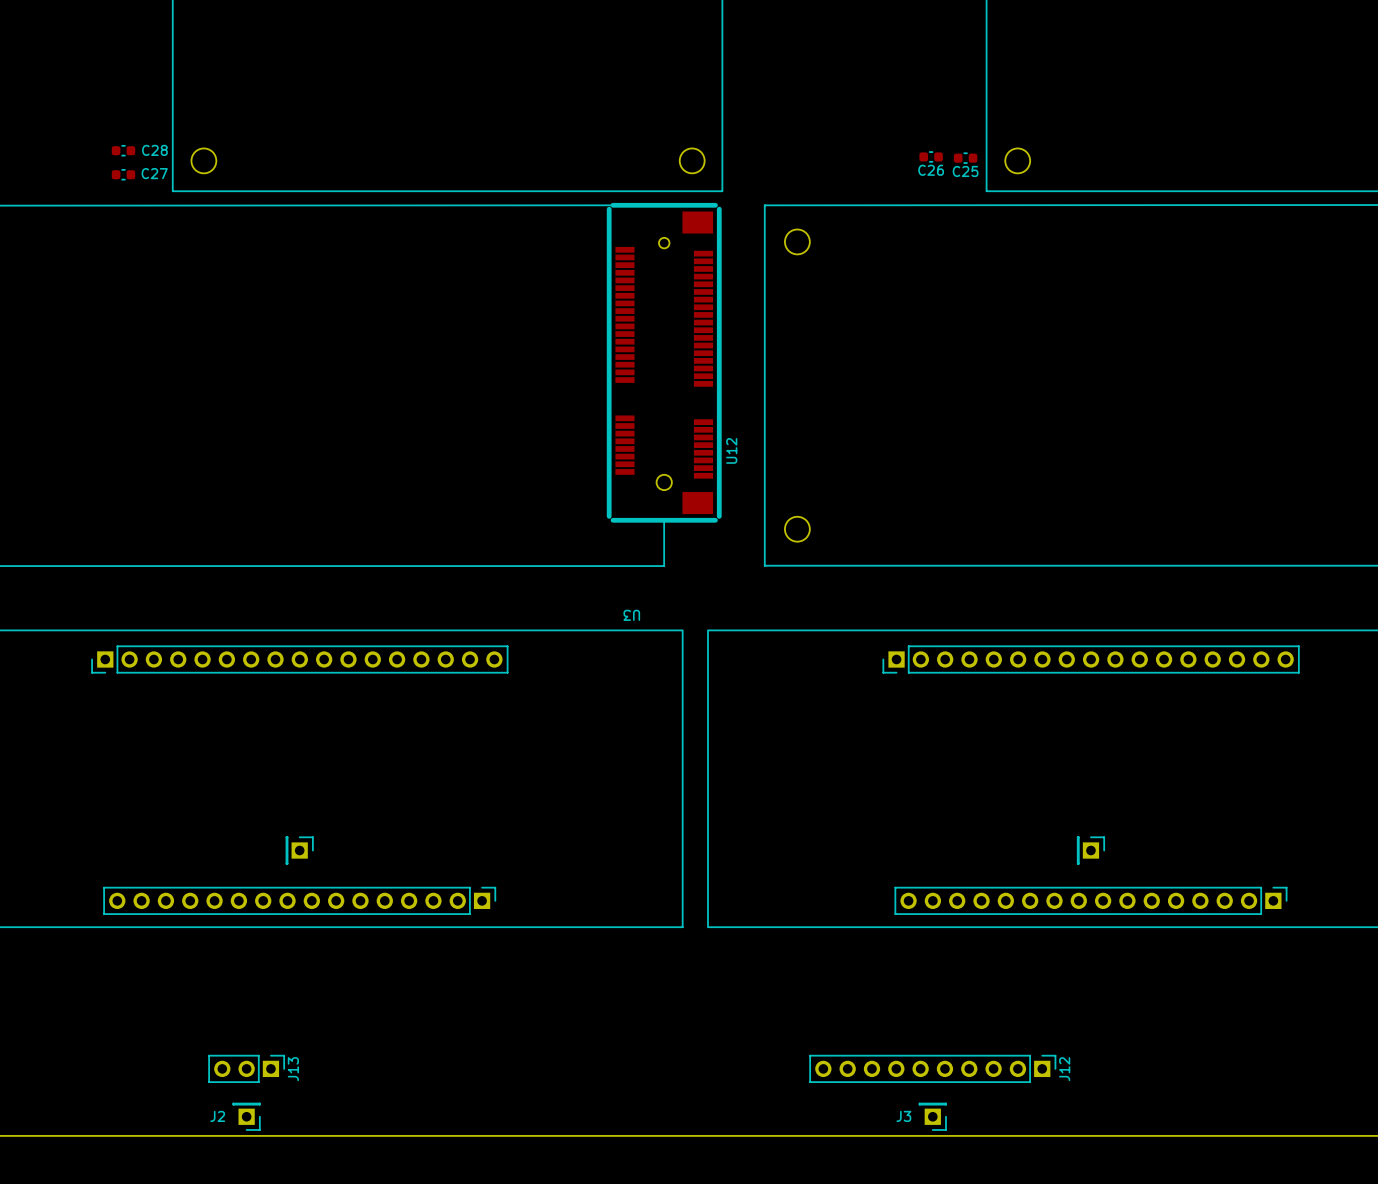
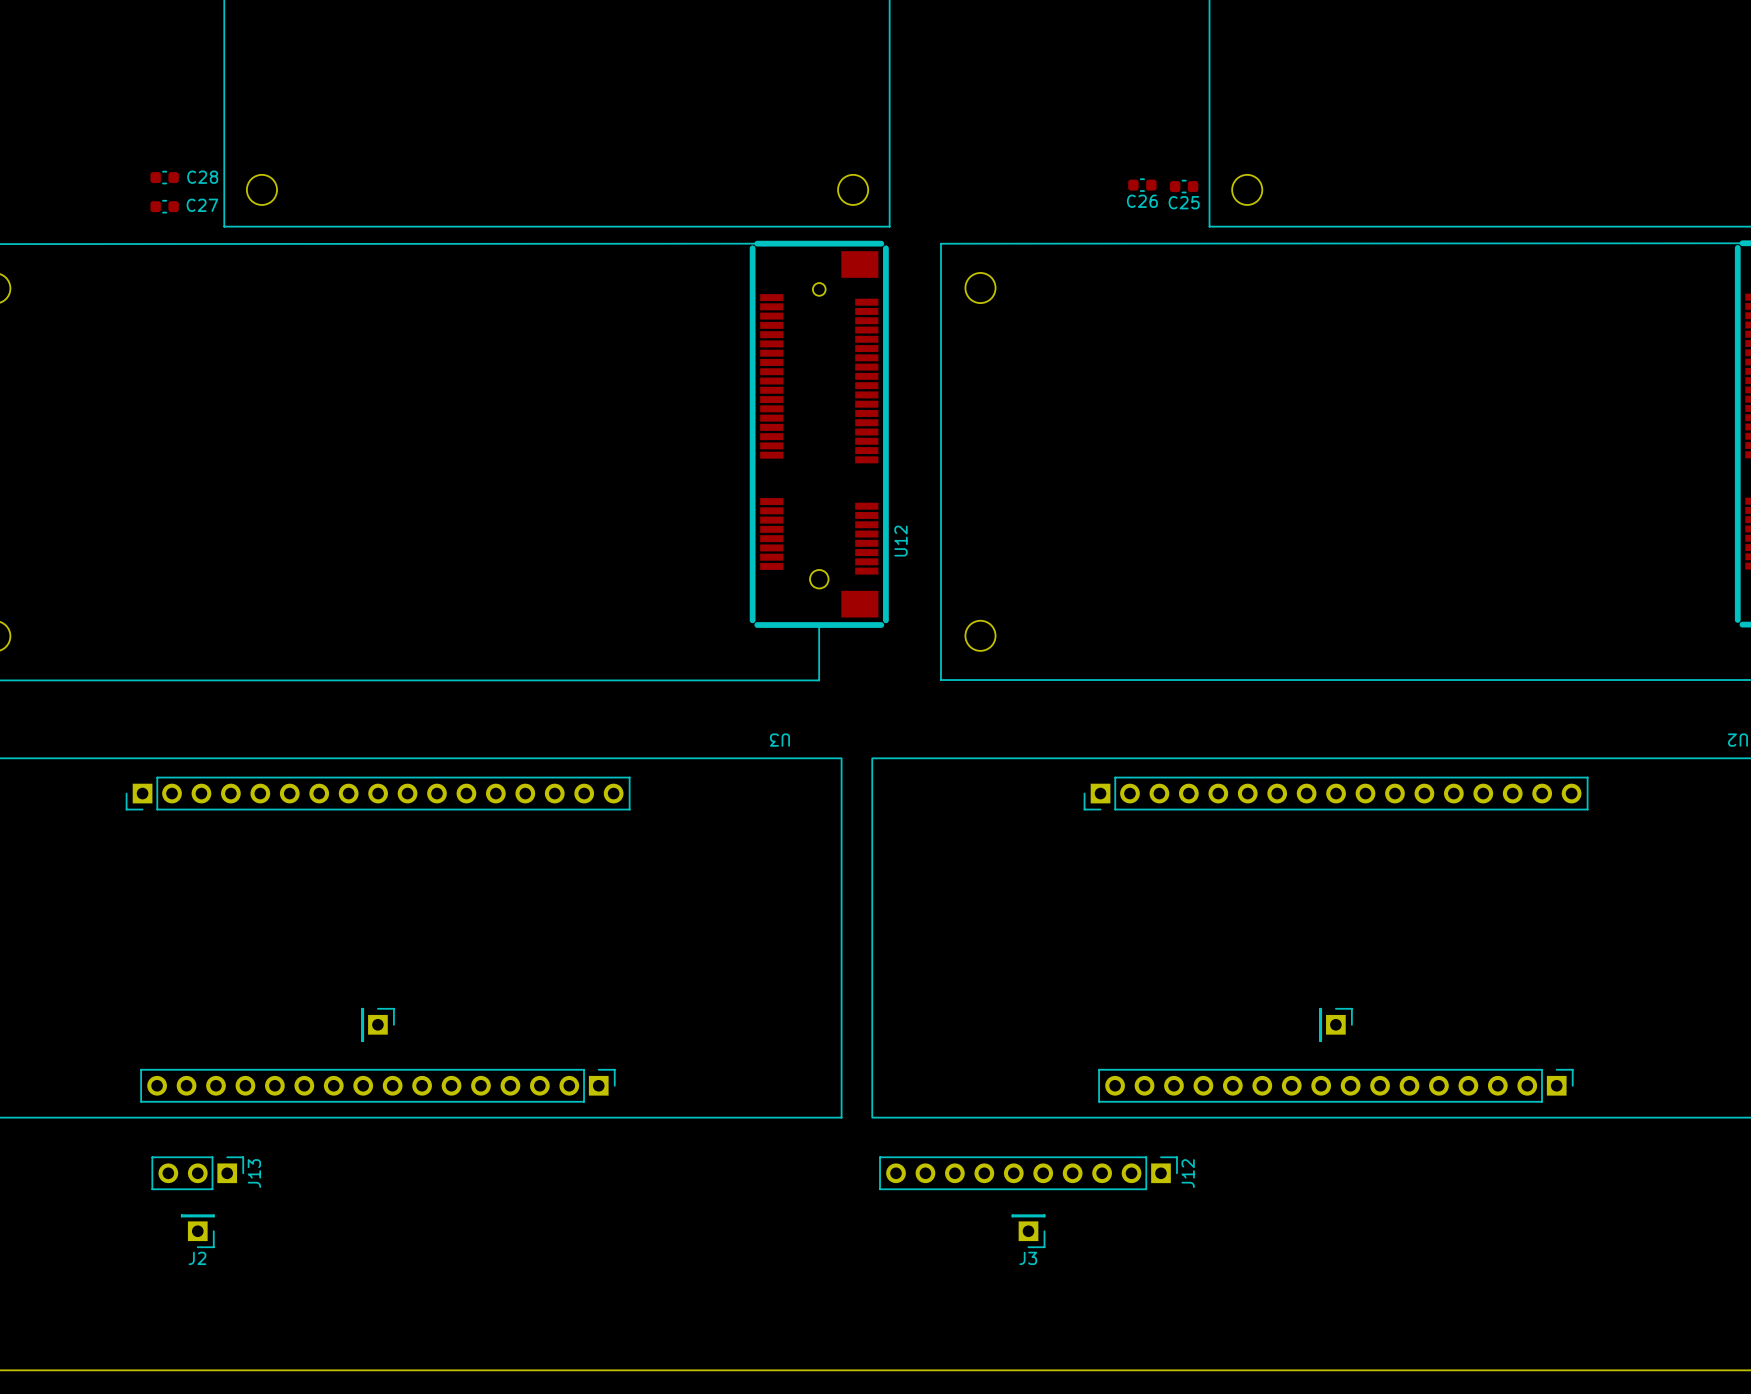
J13 position: (246, 1068) -> (197, 1173)
J12 position: (932, 1068) -> (1028, 1173)
J2 name position: J2 (217, 1116) -> J2 (197, 1258)
J2 position: (246, 1116) -> (197, 1231)
J3 name position: J3 (903, 1116) -> J3 (1028, 1258)
J3 position: (932, 1116) -> (1028, 1231)

